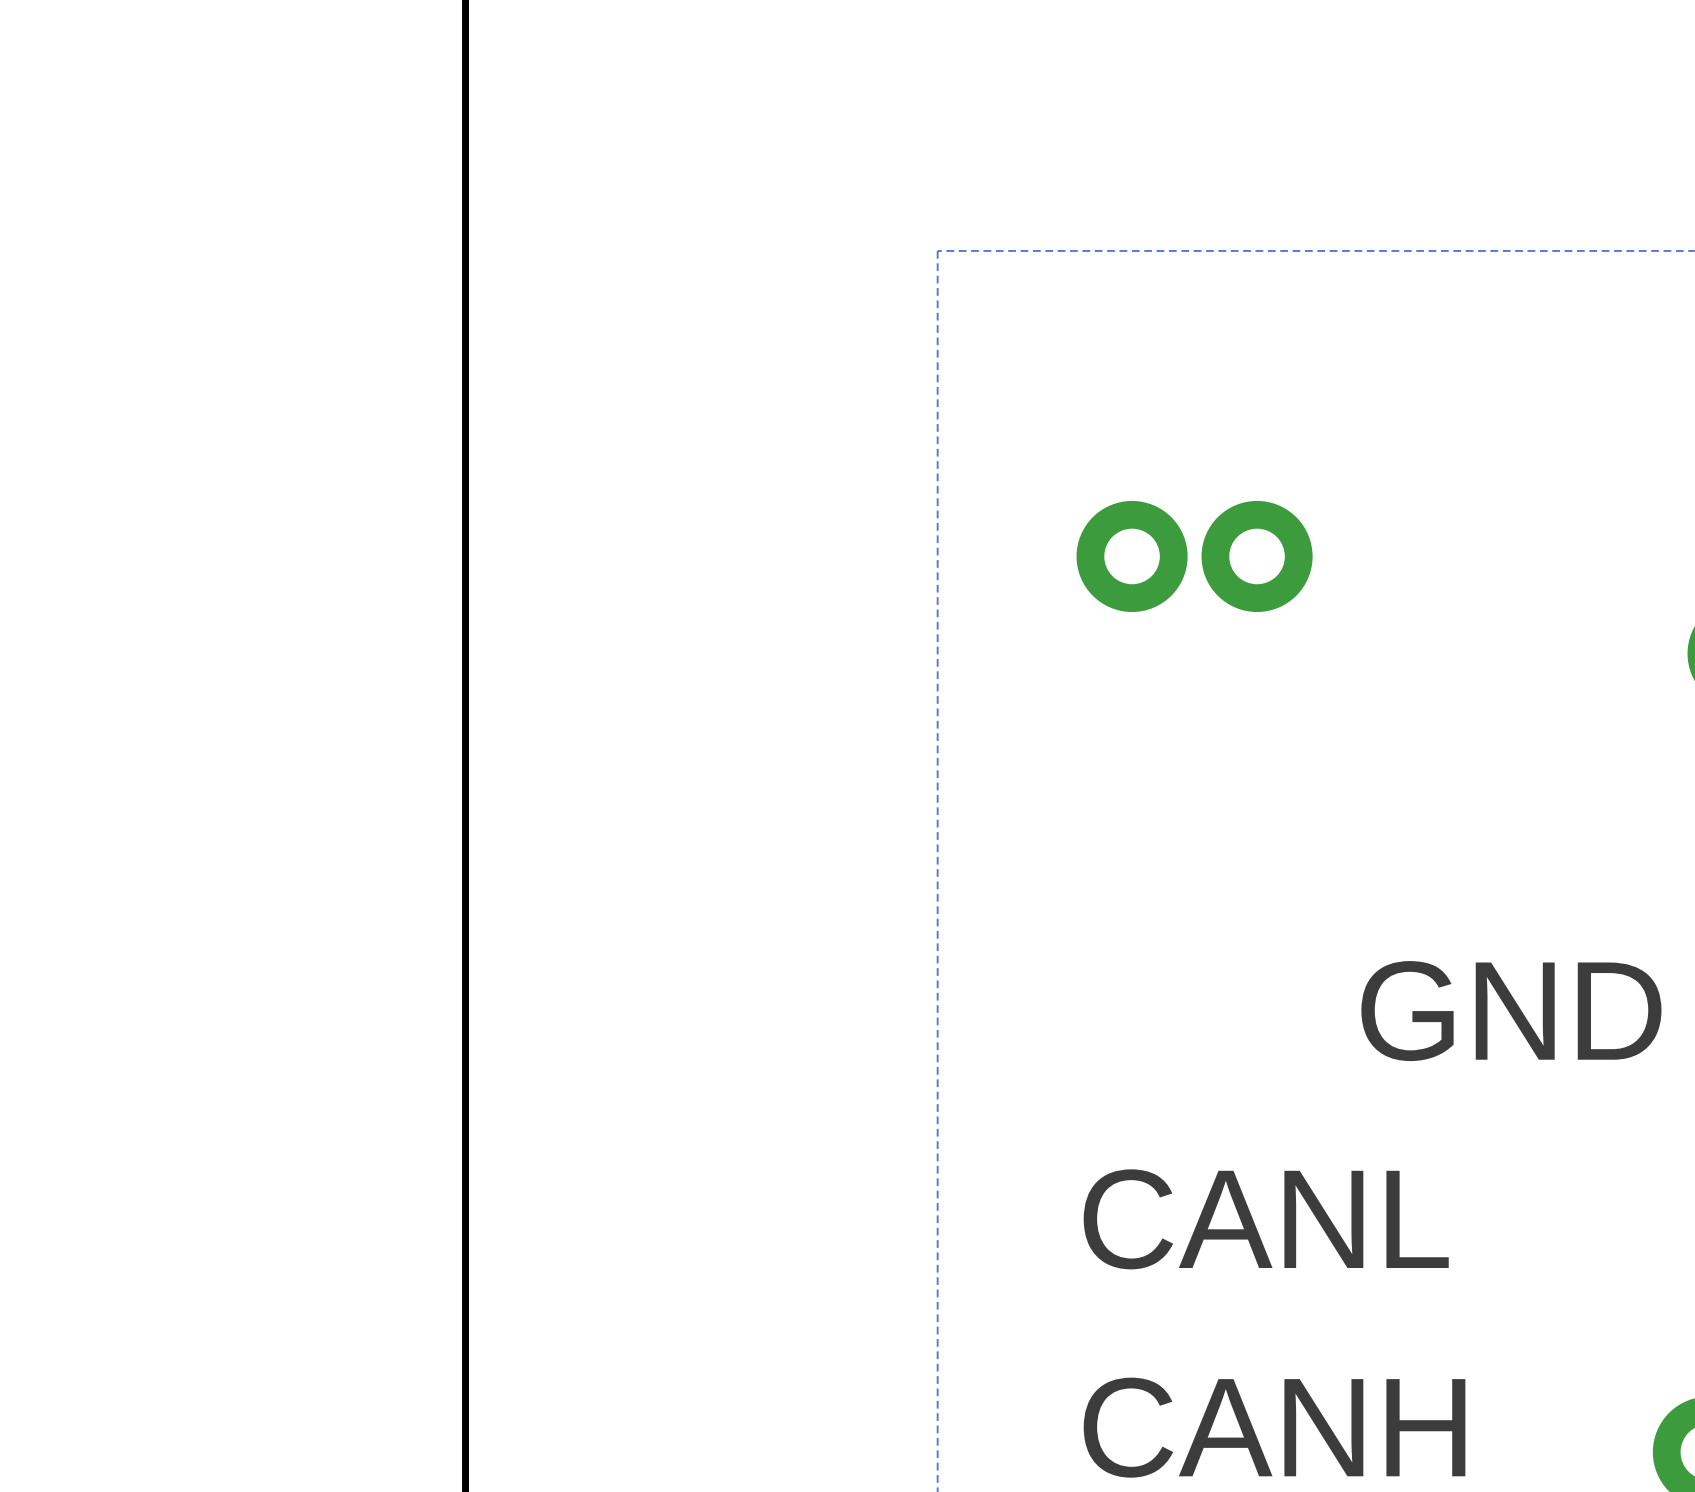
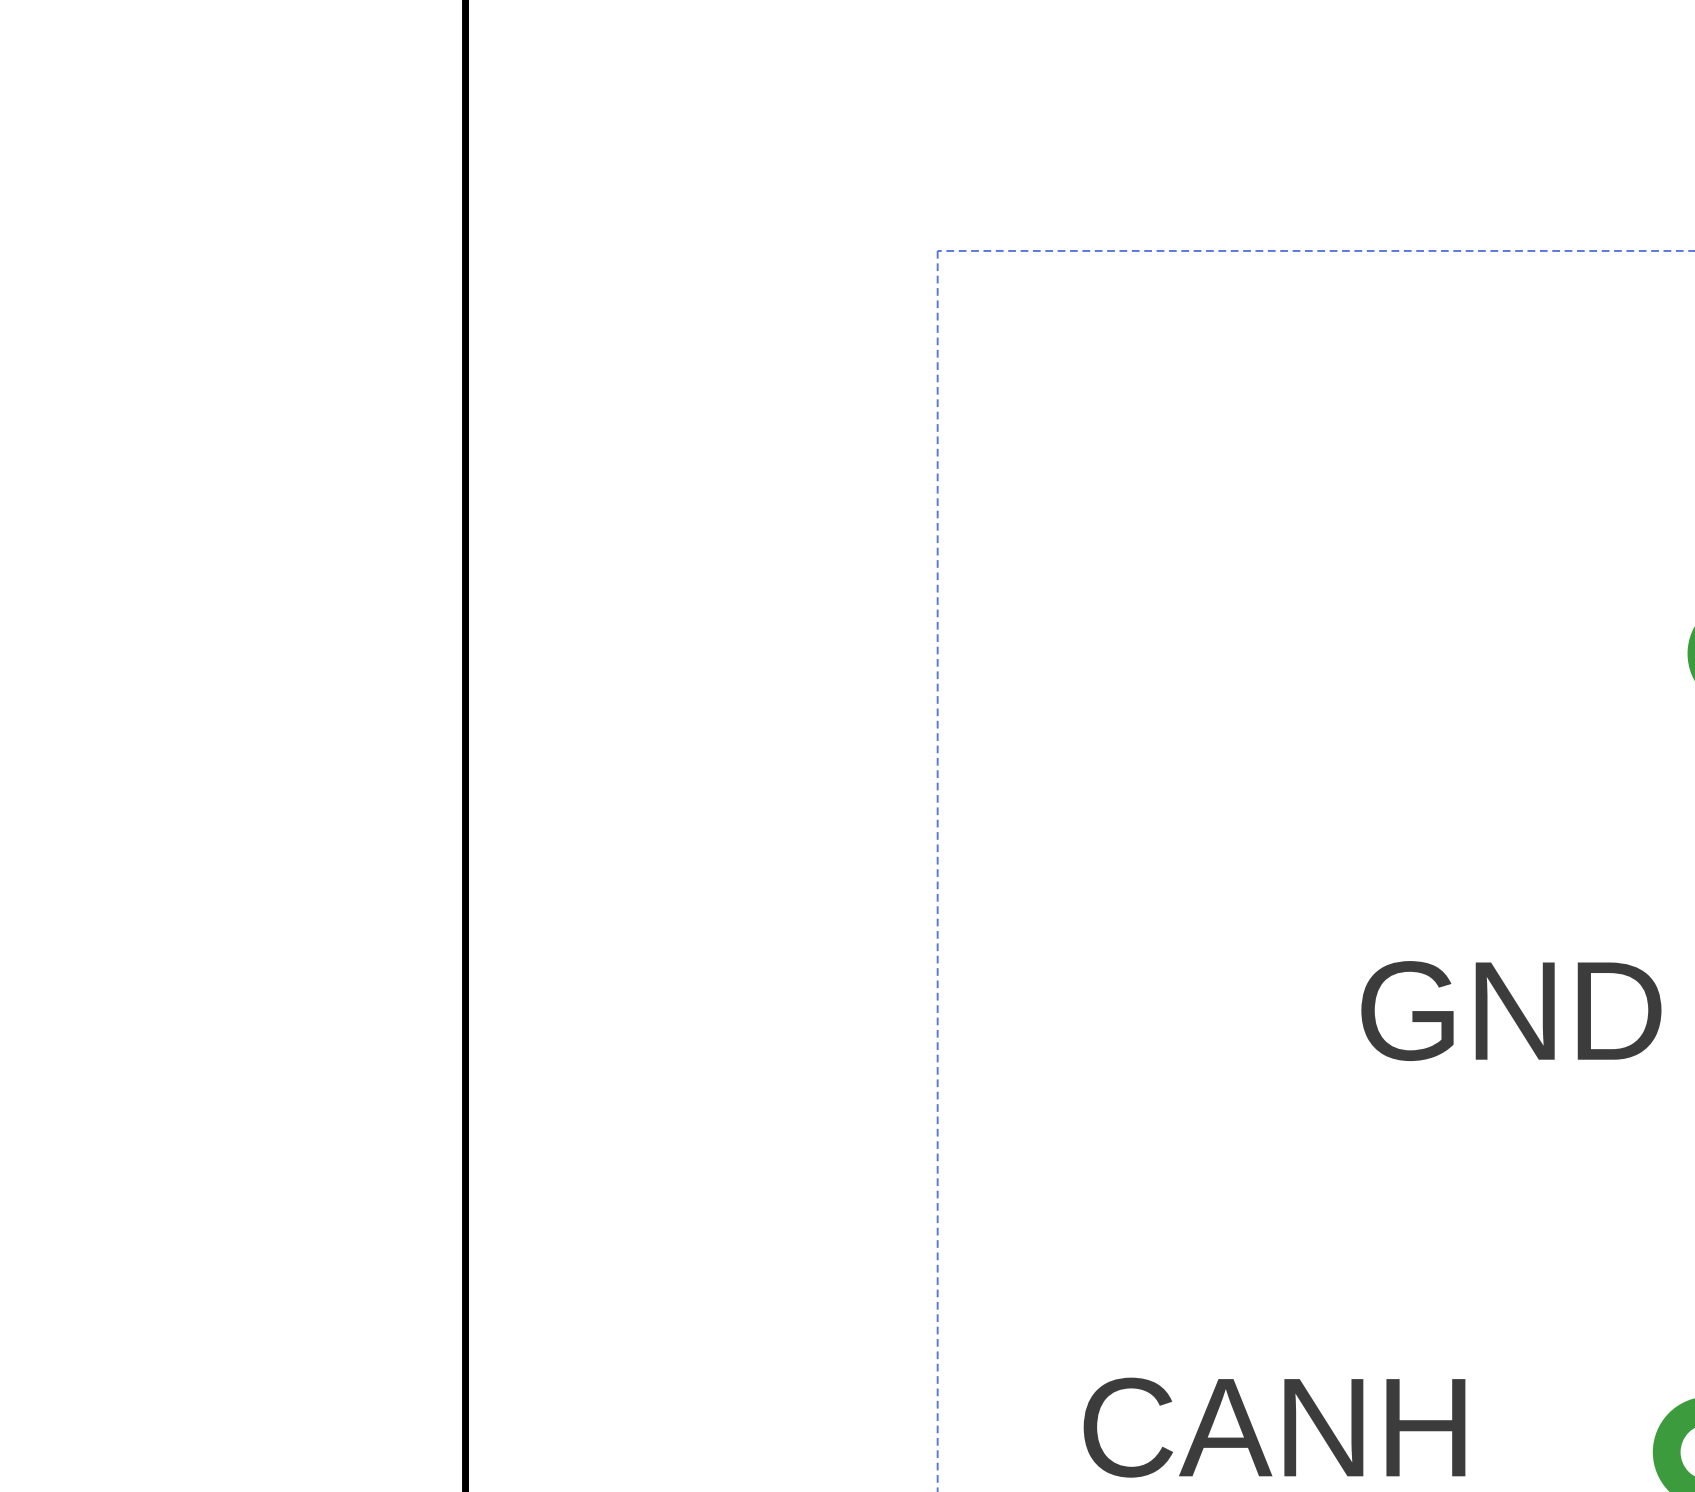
via: (1132, 556) -> none
via: (1257, 556) -> none
text: CANL (1266, 1219) -> none

